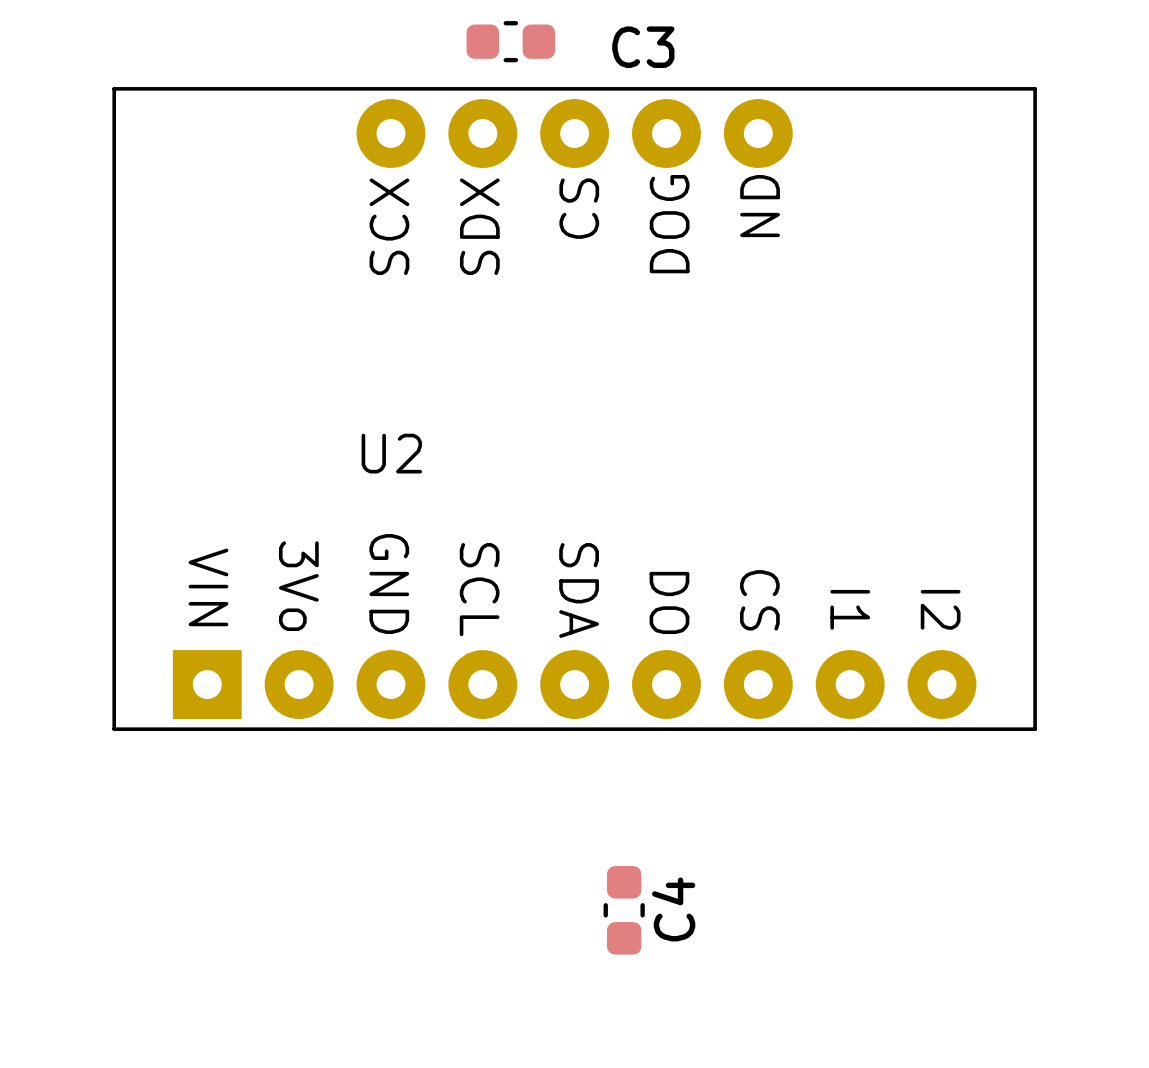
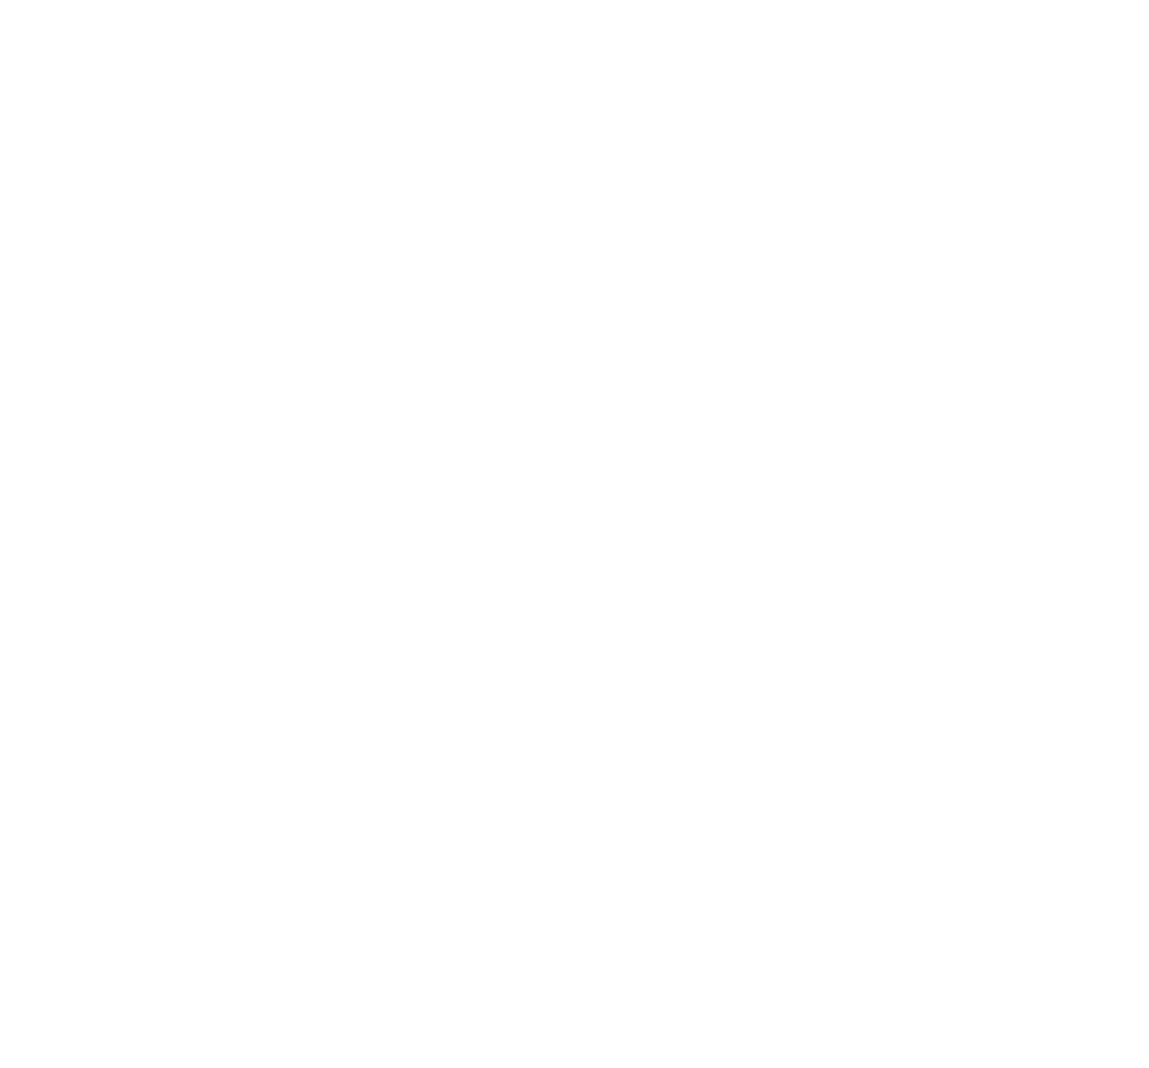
C3: (510, 41) -> none
U2: (574, 409) -> none
C4: (624, 910) -> none

